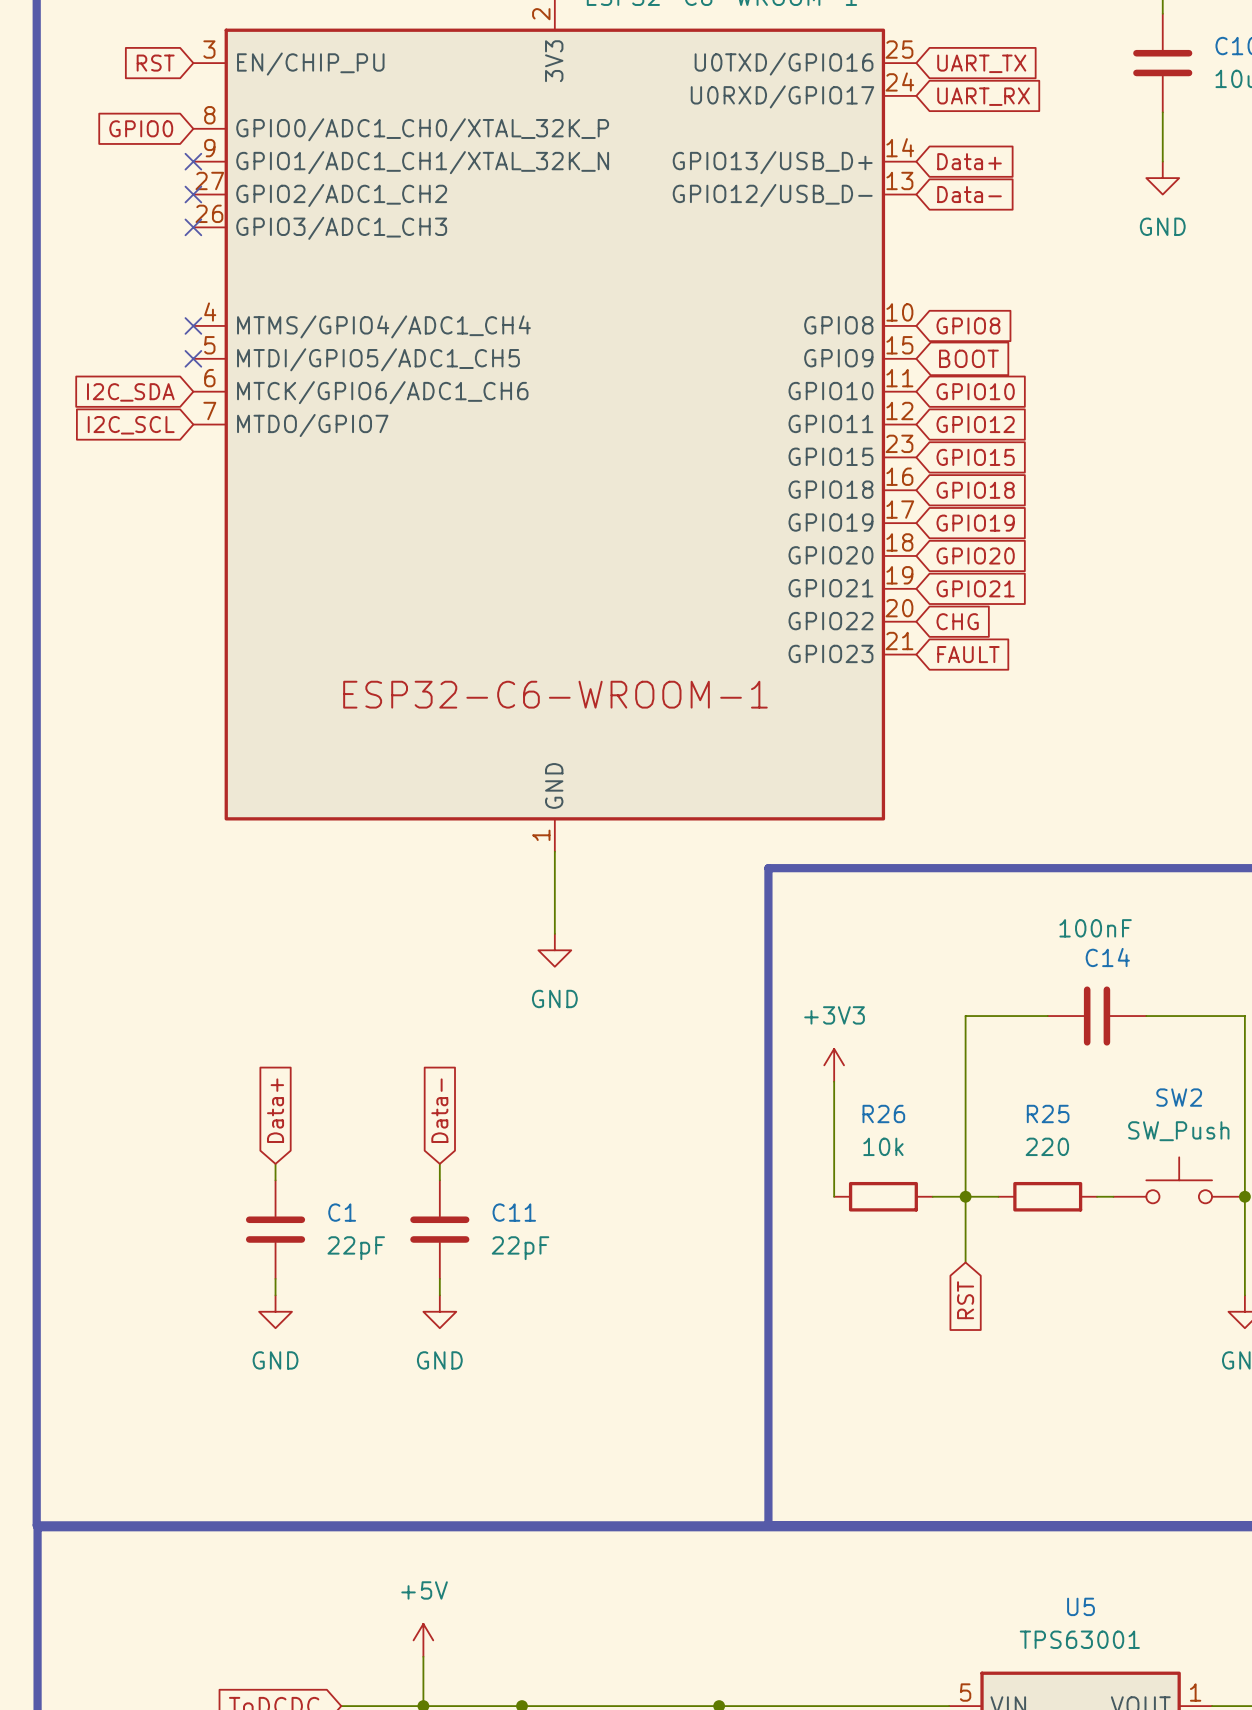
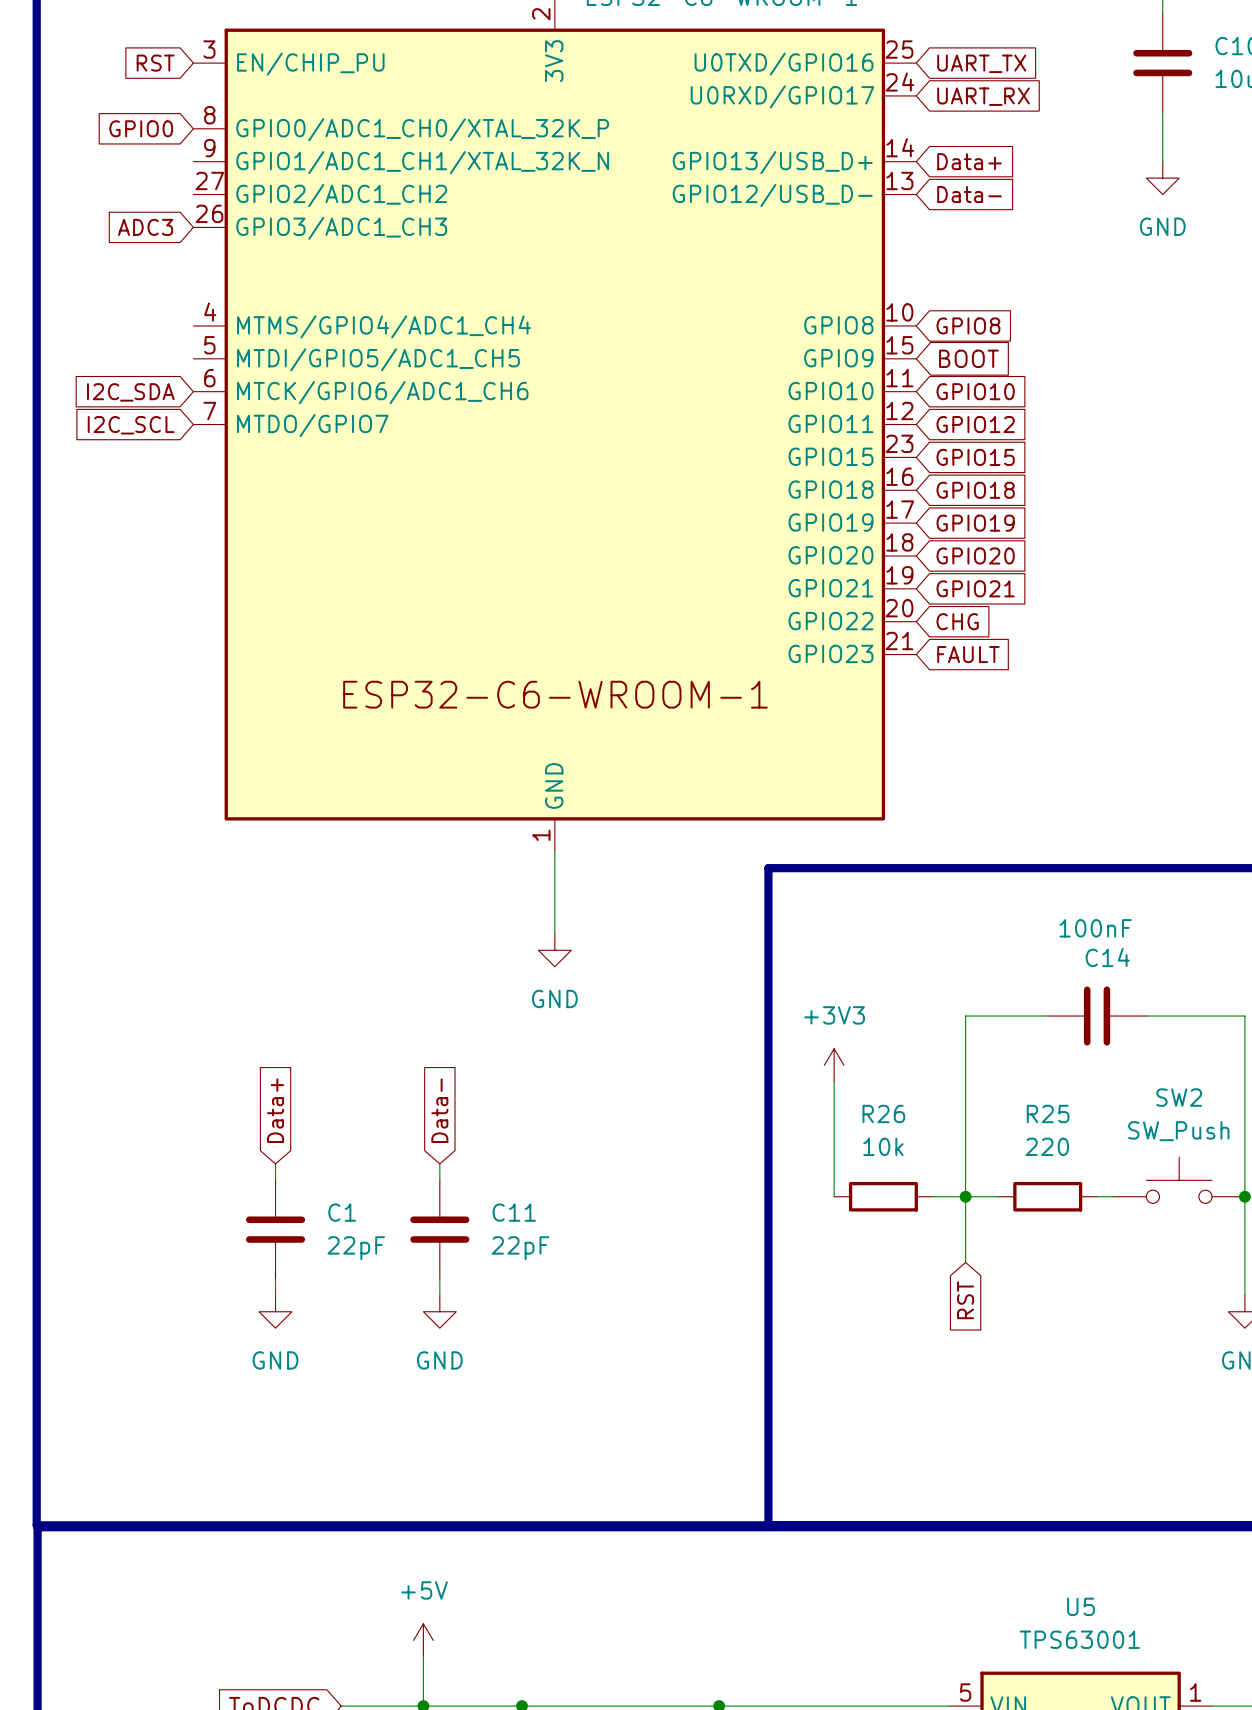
no-connect mark: (193, 161) -> none
no-connect mark: (193, 194) -> none
global label: none -> ADC3 (145, 227)
no-connect mark: (193, 227) -> none
no-connect mark: (193, 325) -> none
no-connect mark: (193, 358) -> none

